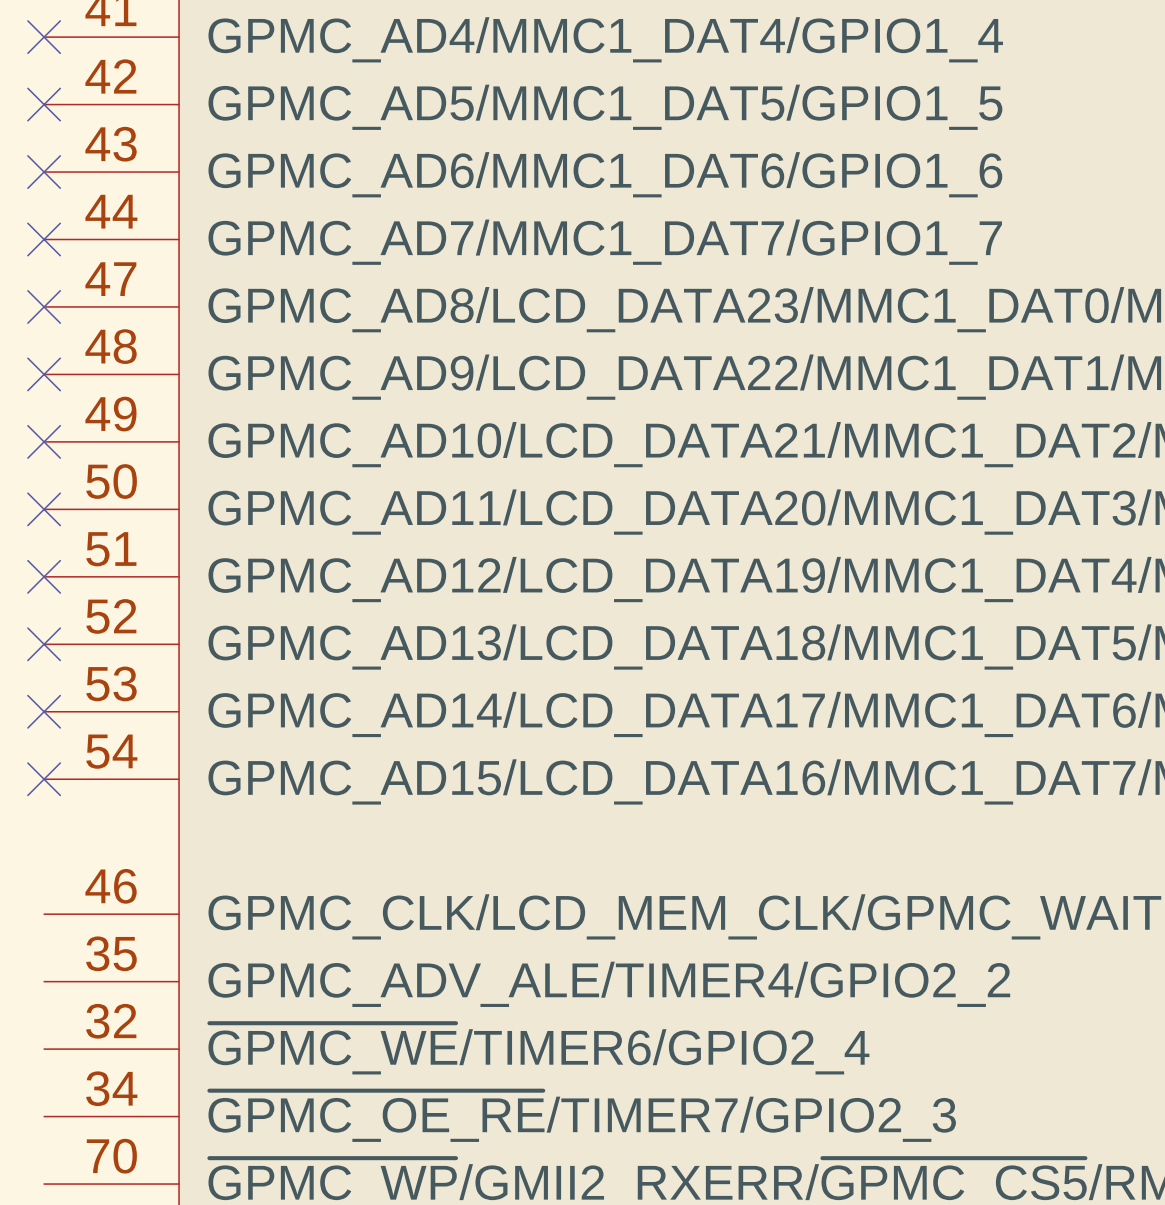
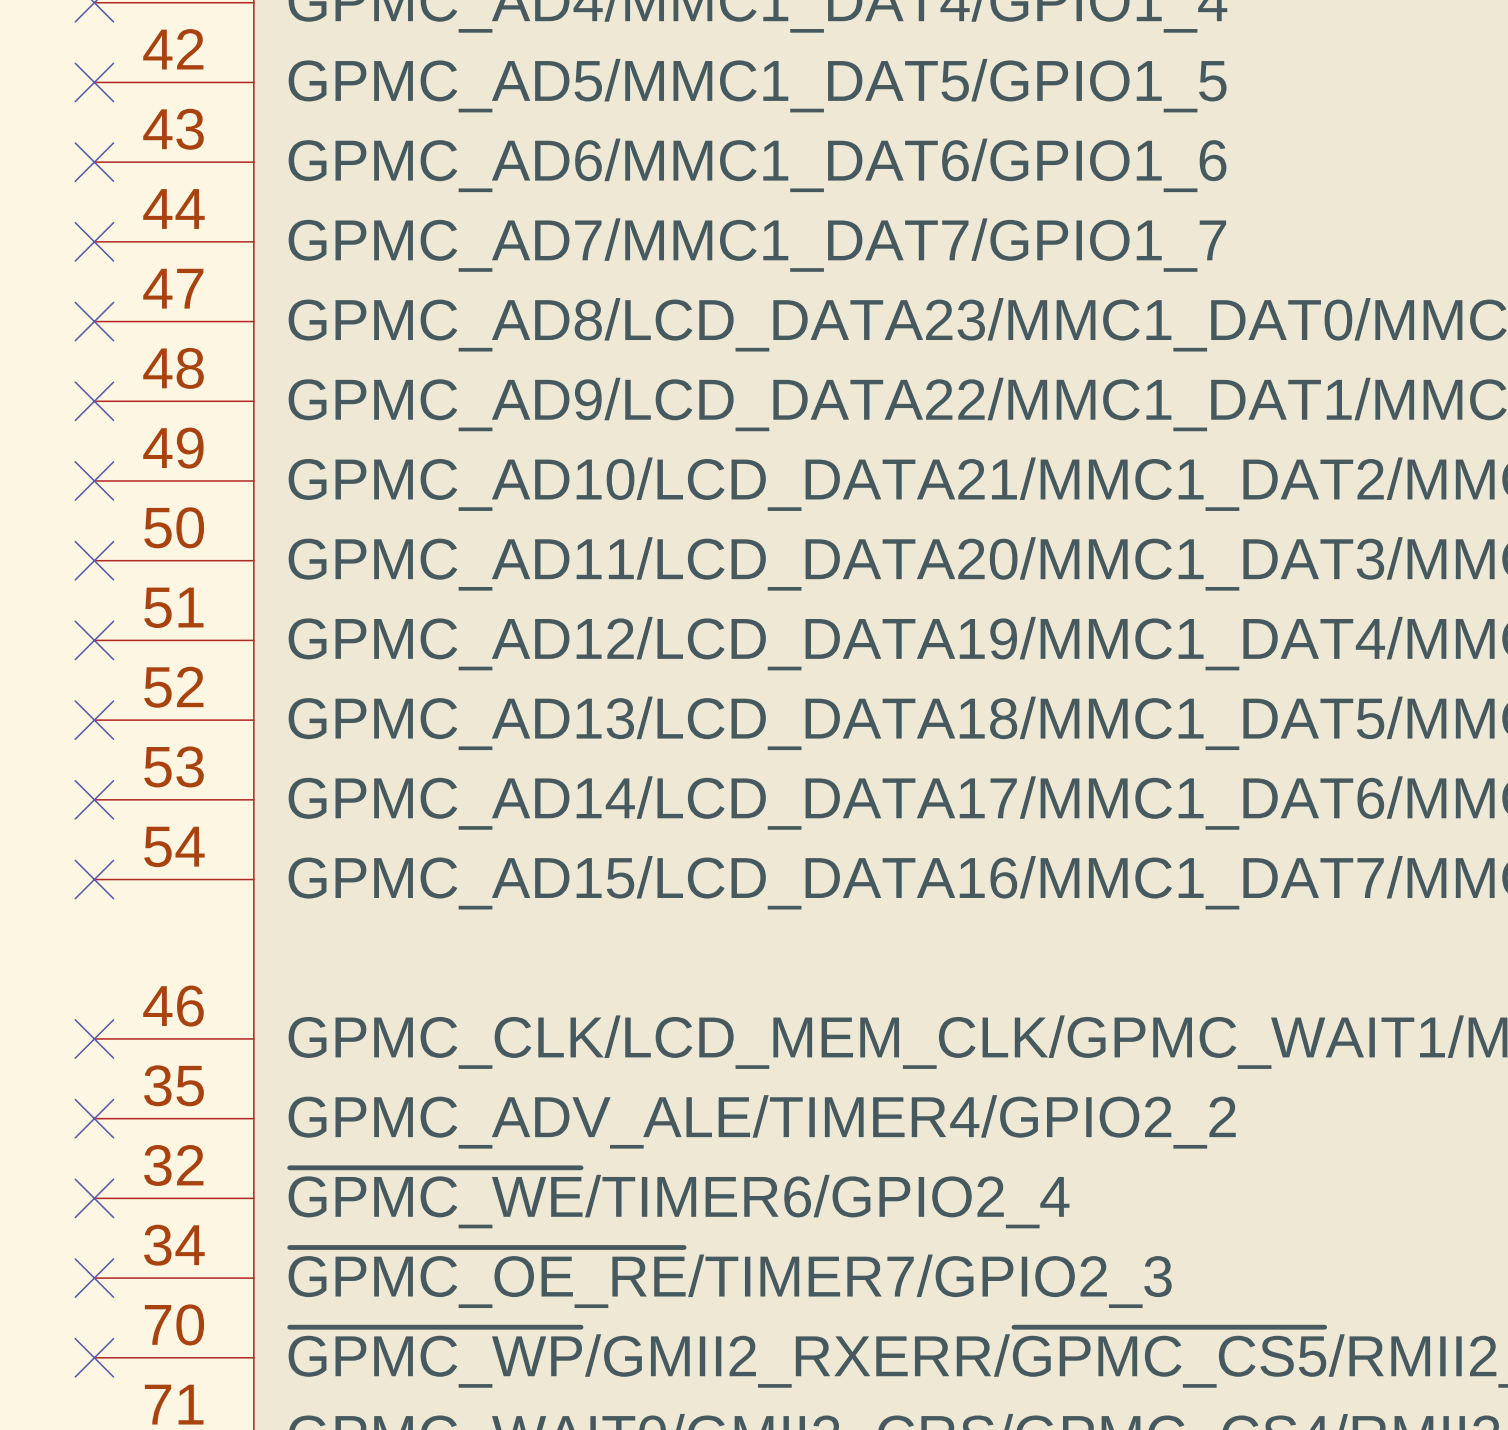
no-connect mark: none -> (94, 1038)
no-connect mark: none -> (94, 1118)
no-connect mark: none -> (94, 1198)
no-connect mark: none -> (94, 1278)
no-connect mark: none -> (94, 1357)

